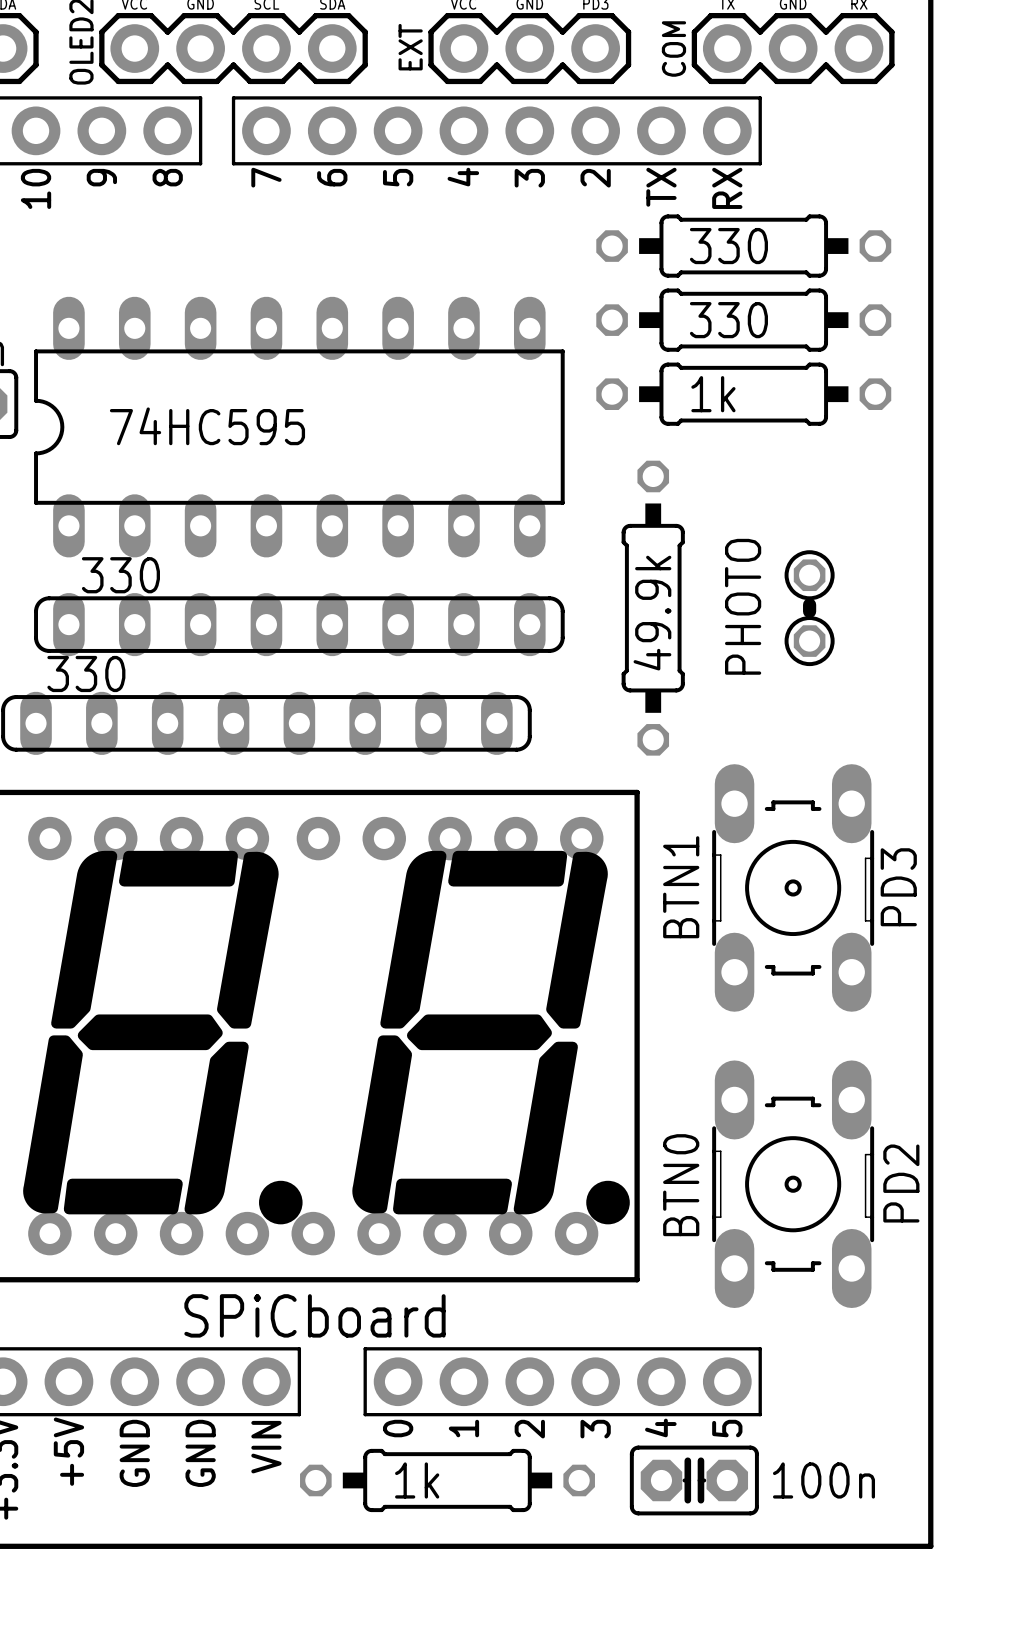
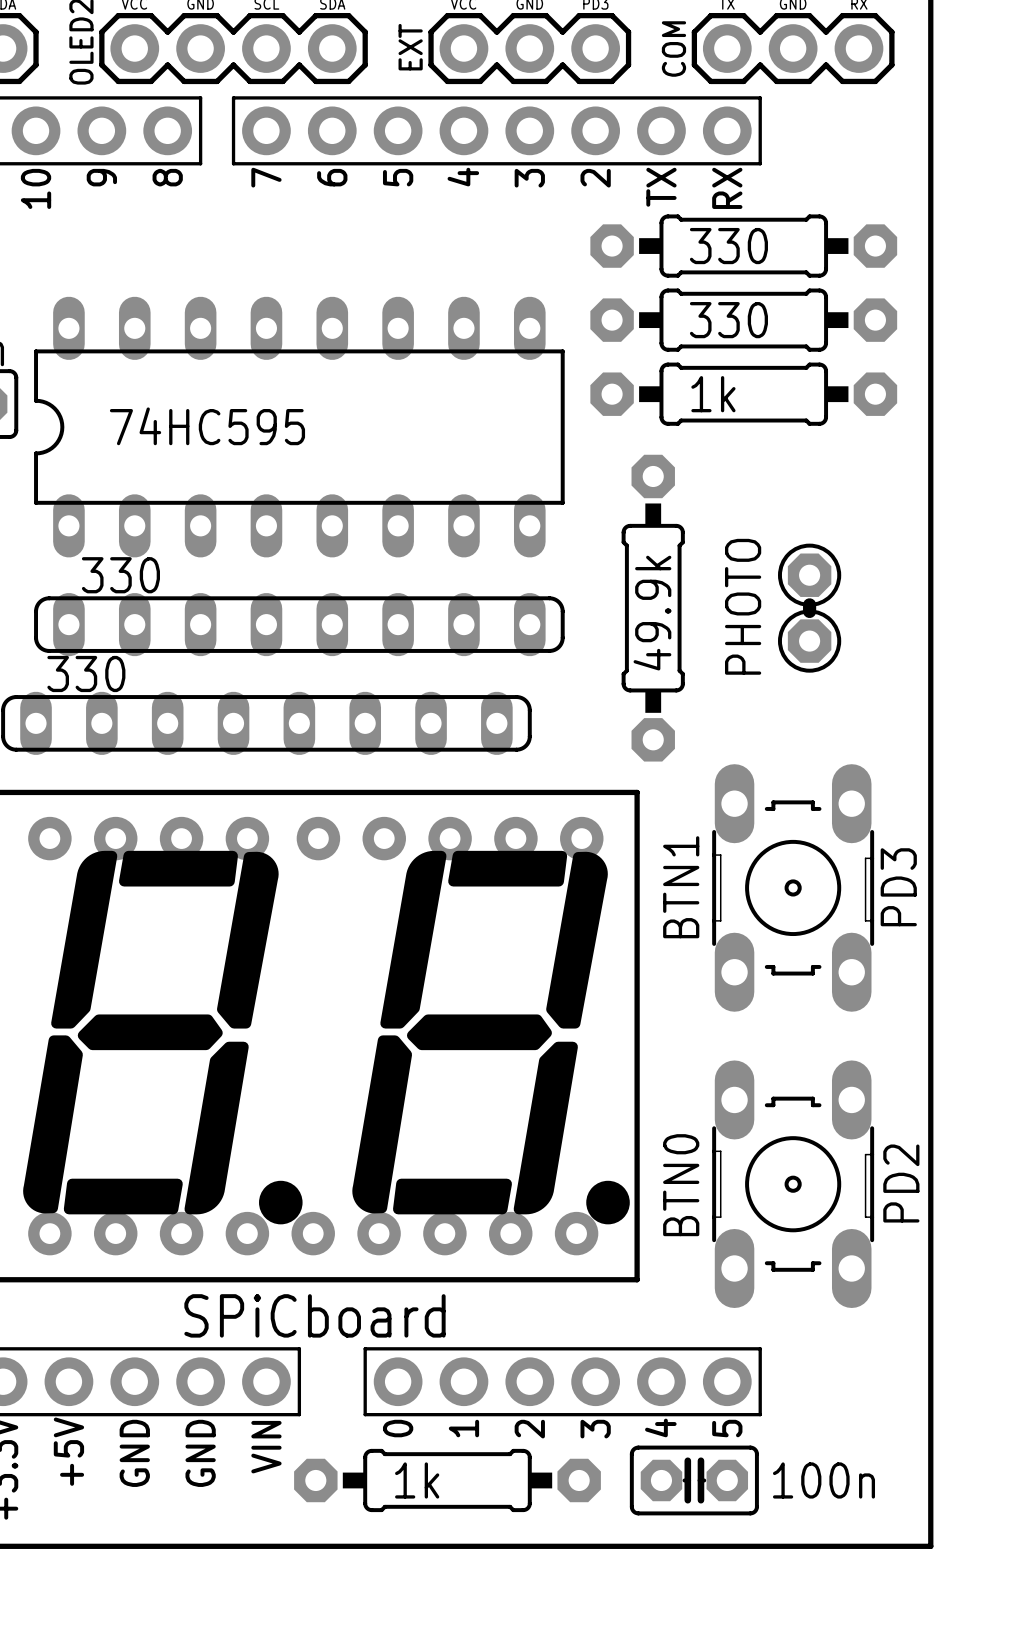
part footprint: [596, 214, 892, 278] -> [590, 214, 898, 278]
part footprint: [596, 288, 892, 352] -> [590, 288, 898, 352]
part footprint: [596, 362, 892, 426] -> [590, 362, 898, 426]
part footprint: [621, 460, 685, 756] -> [621, 454, 685, 762]
PHOTO footprint: [784, 550, 835, 667] -> [778, 543, 842, 673]
part footprint: [300, 1448, 595, 1513] -> [294, 1448, 601, 1513]

